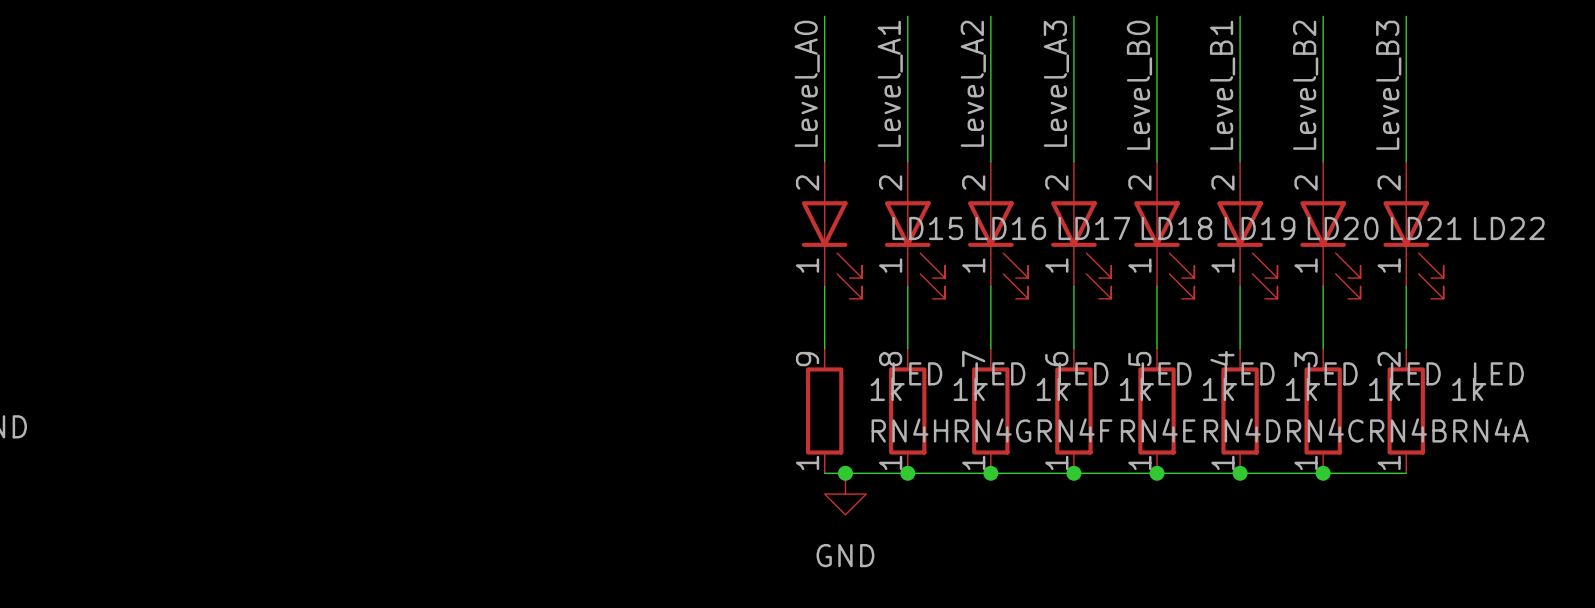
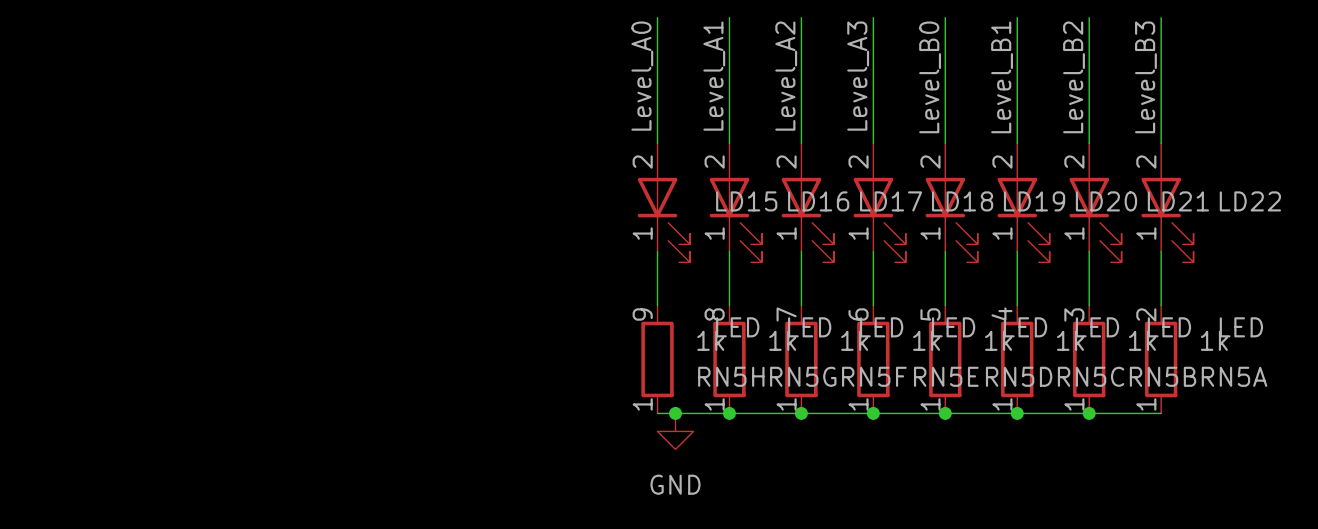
RN4H name: RN4H (909, 430) -> RN5H (731, 376)
RN4G name: RN4G (992, 430) -> RN5G (803, 376)
RN4F name: RN4F (1075, 430) -> RN5F (874, 376)
RN4E name: RN4E (1158, 430) -> RN5E (946, 376)
RN4D name: RN4D (1242, 430) -> RN5D (1019, 376)
RN4C name: RN4C (1325, 430) -> RN5C (1091, 376)
RN4B name: RN4B (1408, 430) -> RN5B (1163, 376)
RN4A name: RN4A (1490, 430) -> RN5A (1234, 376)

